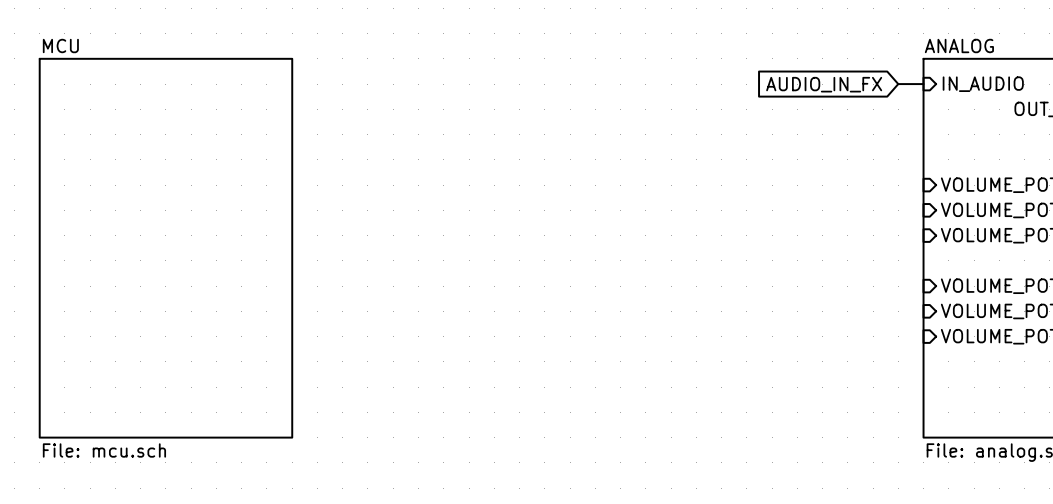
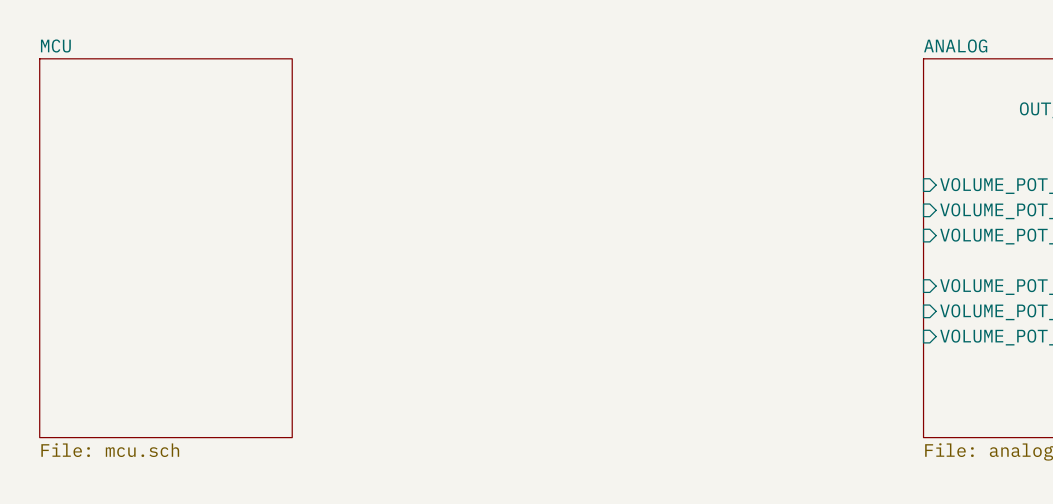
global label: AUDIO_IN_FX (824, 84) -> none
wire: (898, 84) (923, 84) -> none
sheet pin: IN_AUDIO (983, 84) -> none

